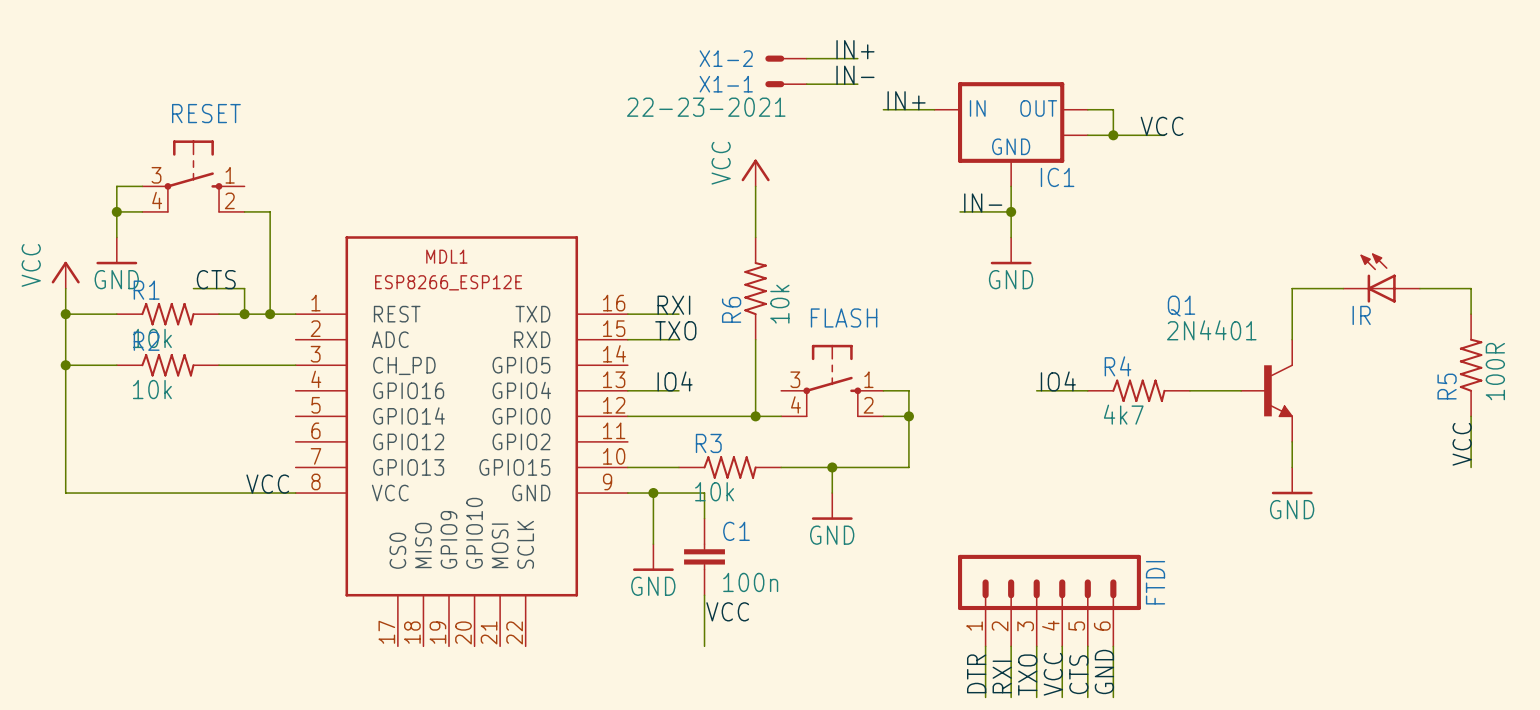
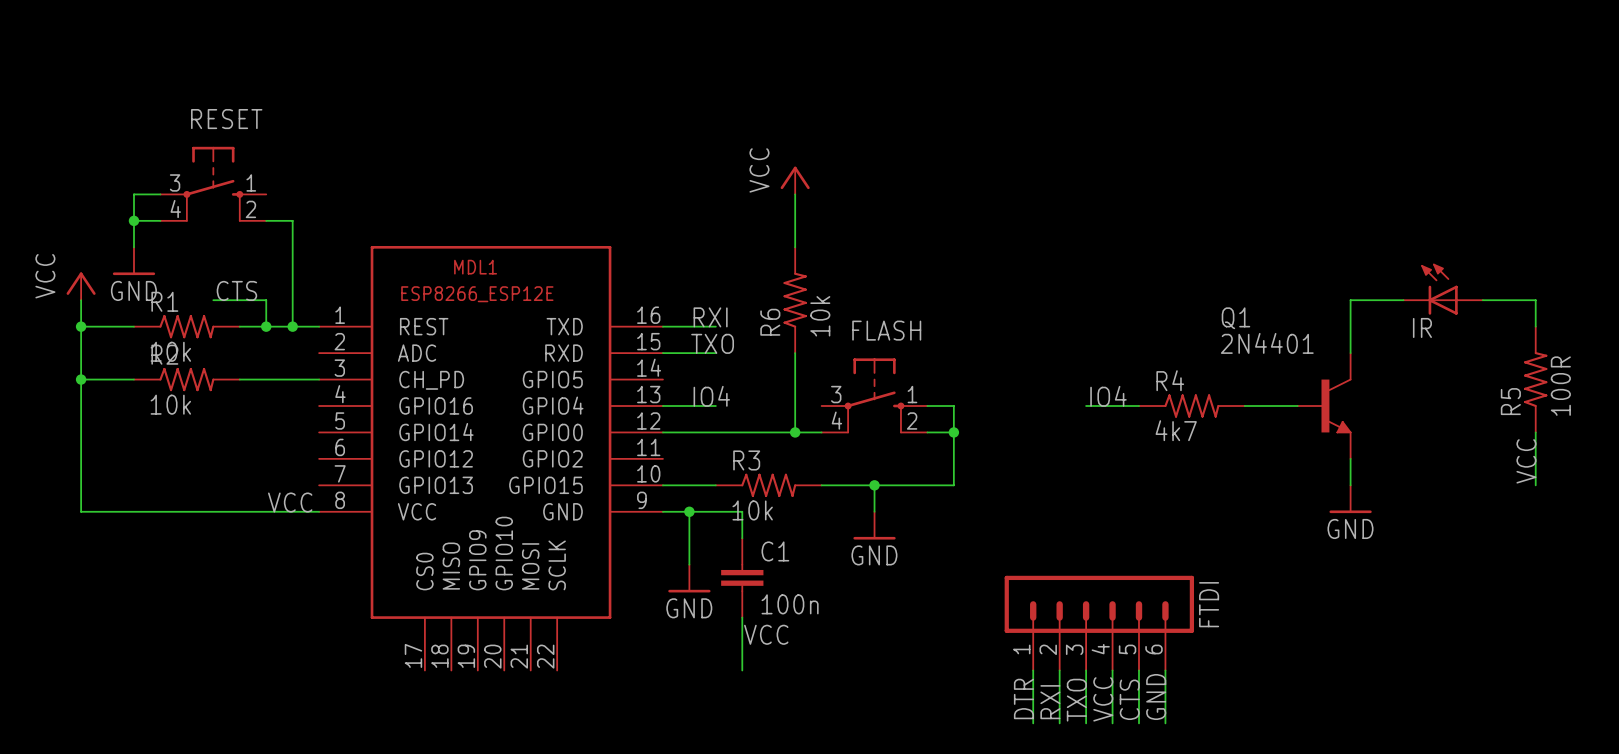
label: IN+ (855, 49) -> none
X1-2: (786, 58) -> none
wire: (806, 58) (857, 58) -> none
label: IN- (855, 75) -> none
X1-1: 22-23-2021 (786, 84) -> none
wire: (806, 84) (857, 84) -> none
label: IN+ (906, 100) -> none
wire: (883, 109) (934, 109) -> none
wire: (1087, 109) (1113, 109) (1113, 135) -> none
label: VCC (1162, 126) -> none
IC1: (1011, 134) -> none
wire: (1087, 135) (1164, 135) -> none
junction: (1113, 135) -> none
wire: (1011, 186) (1011, 237) -> none
label: IN- (983, 203) -> none
wire: (960, 211) (1011, 211) -> none
junction: (1011, 211) -> none
power symbol: GND (1011, 250) -> none

